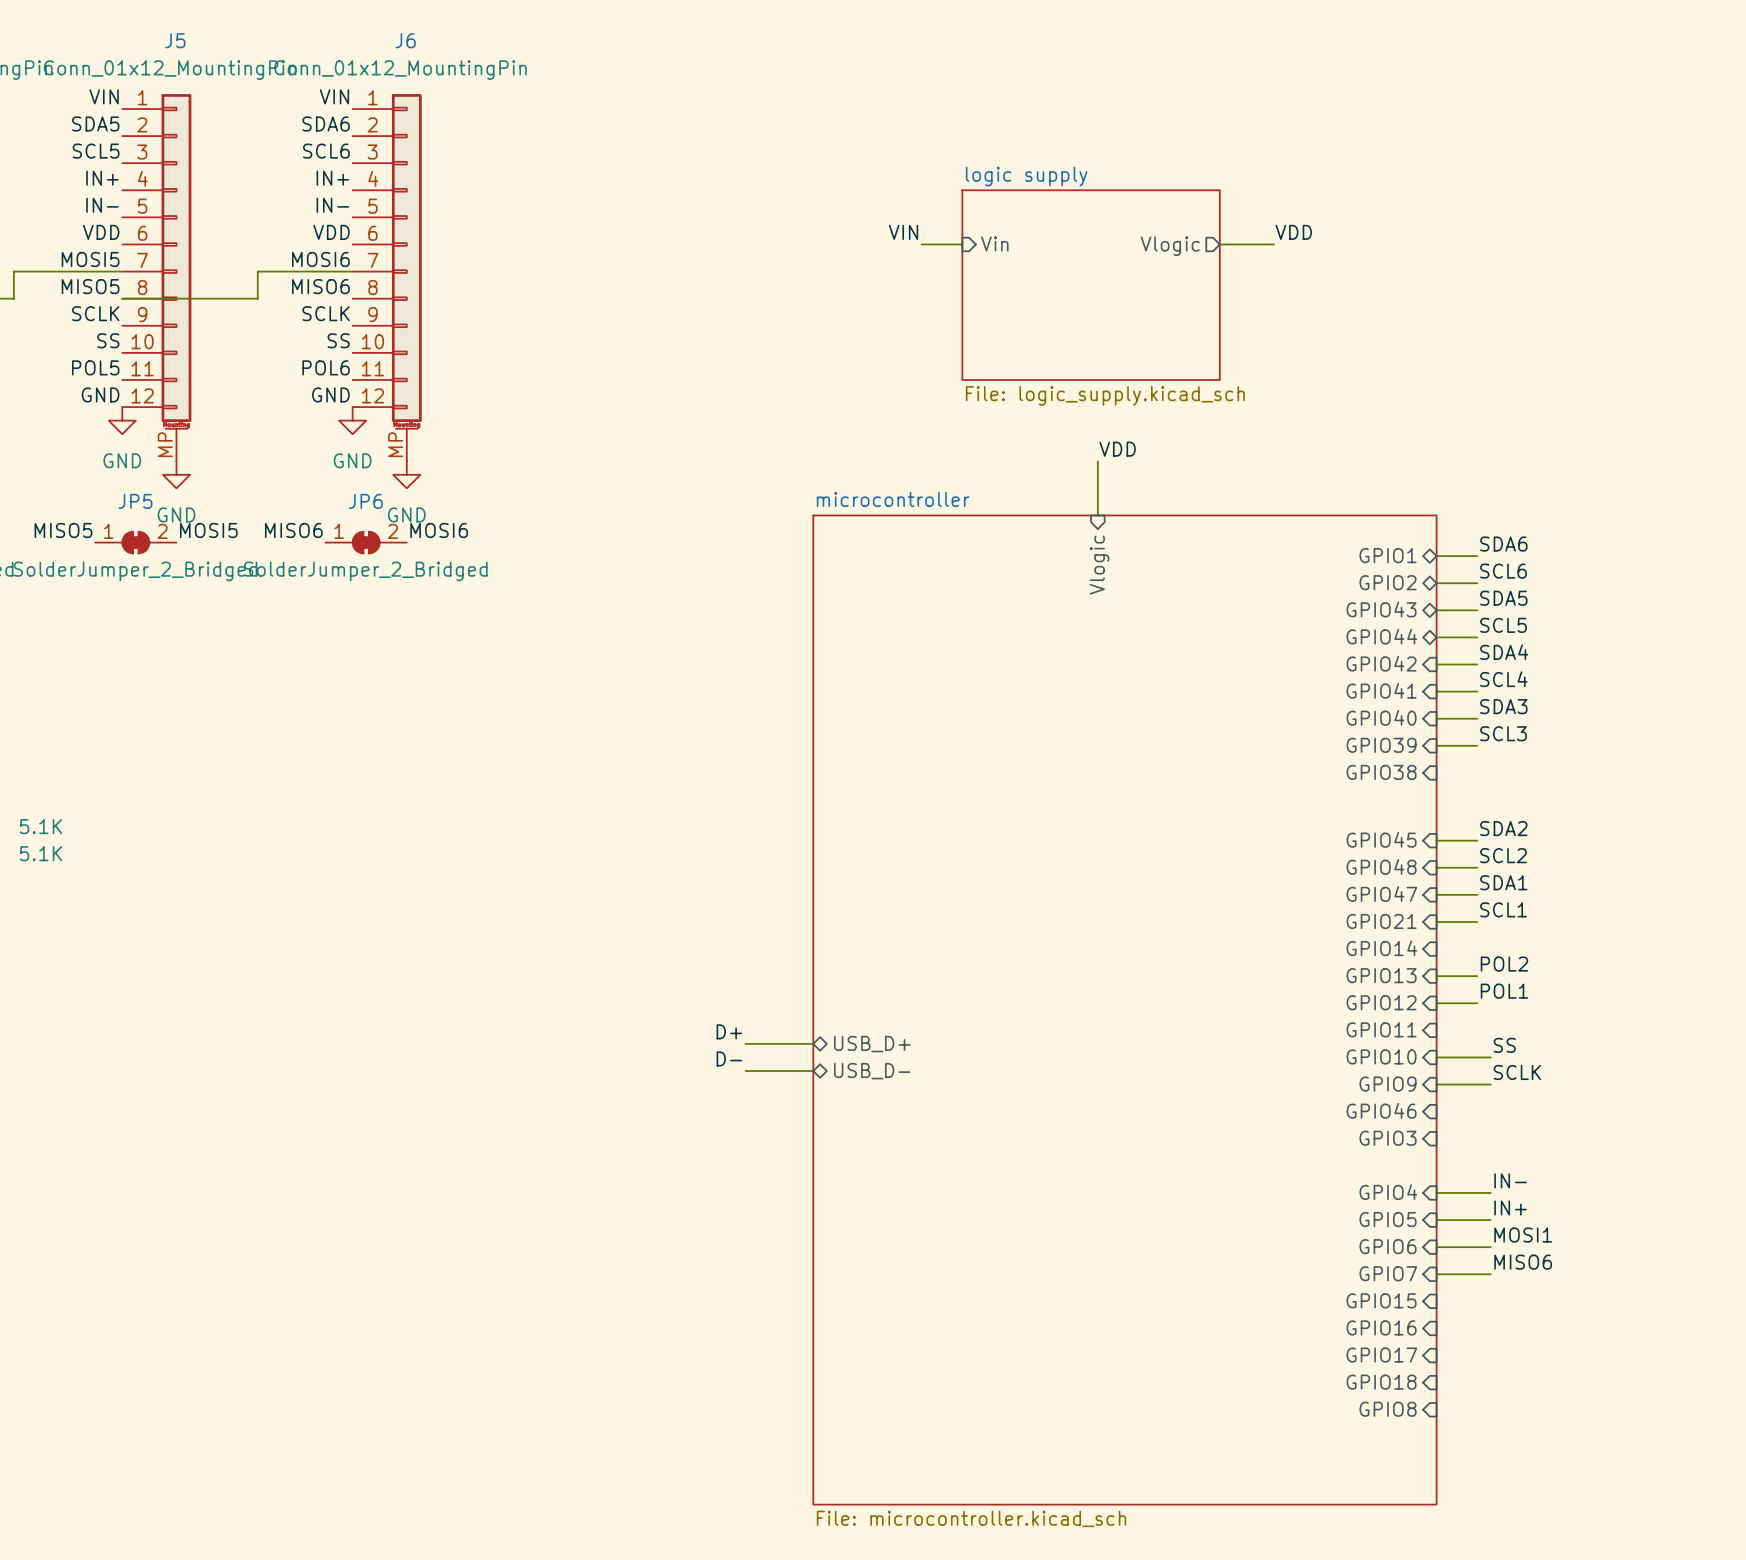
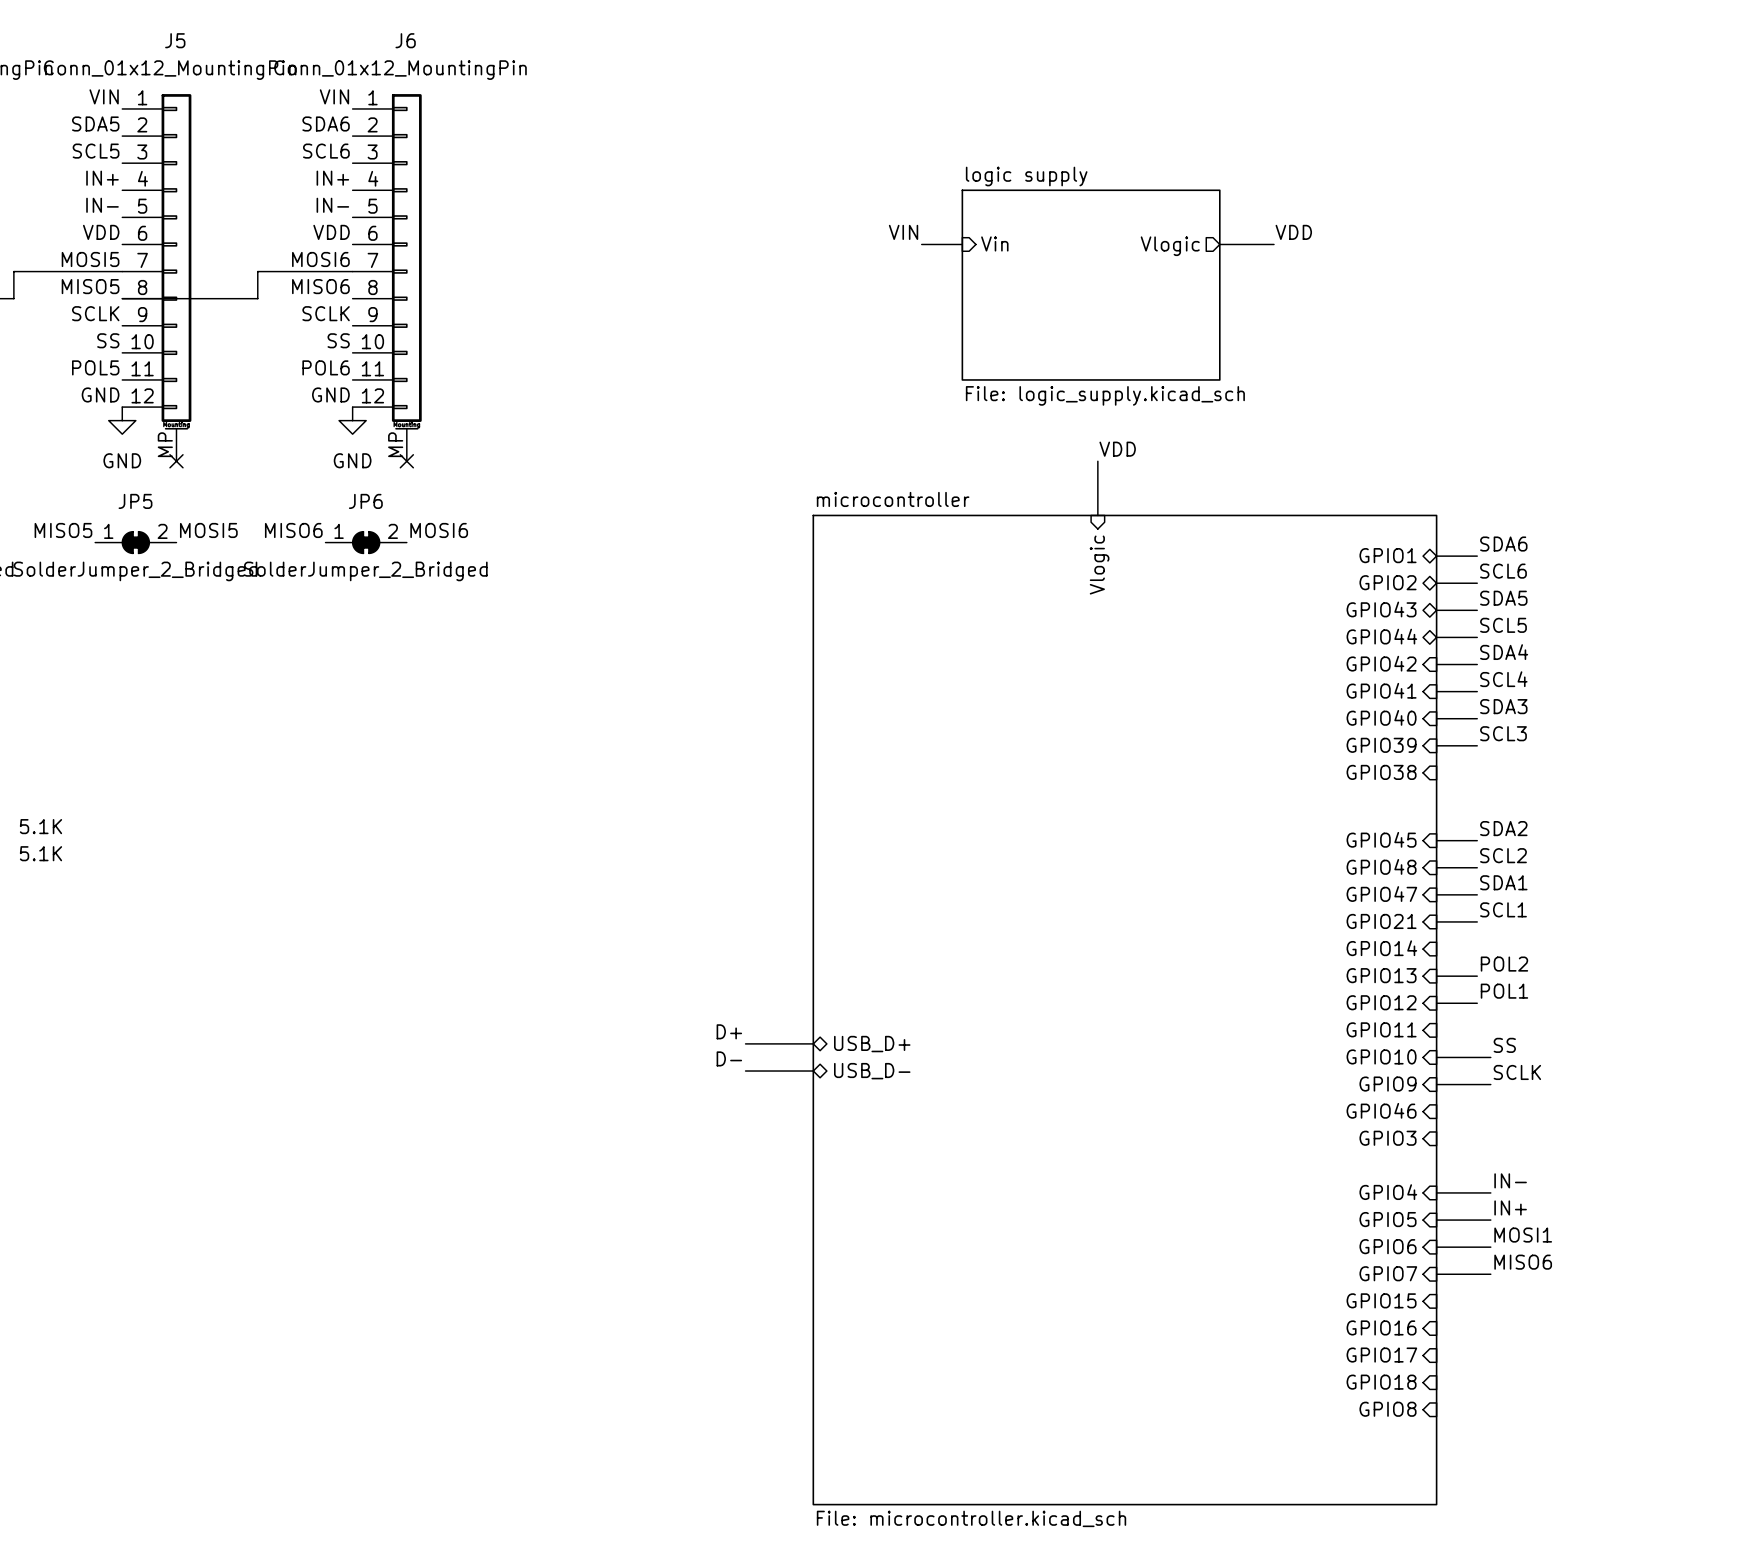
no-connect mark: none -> (176, 461)
no-connect mark: none -> (406, 461)
power symbol: GND (176, 474) -> none
power symbol: GND (406, 474) -> none

